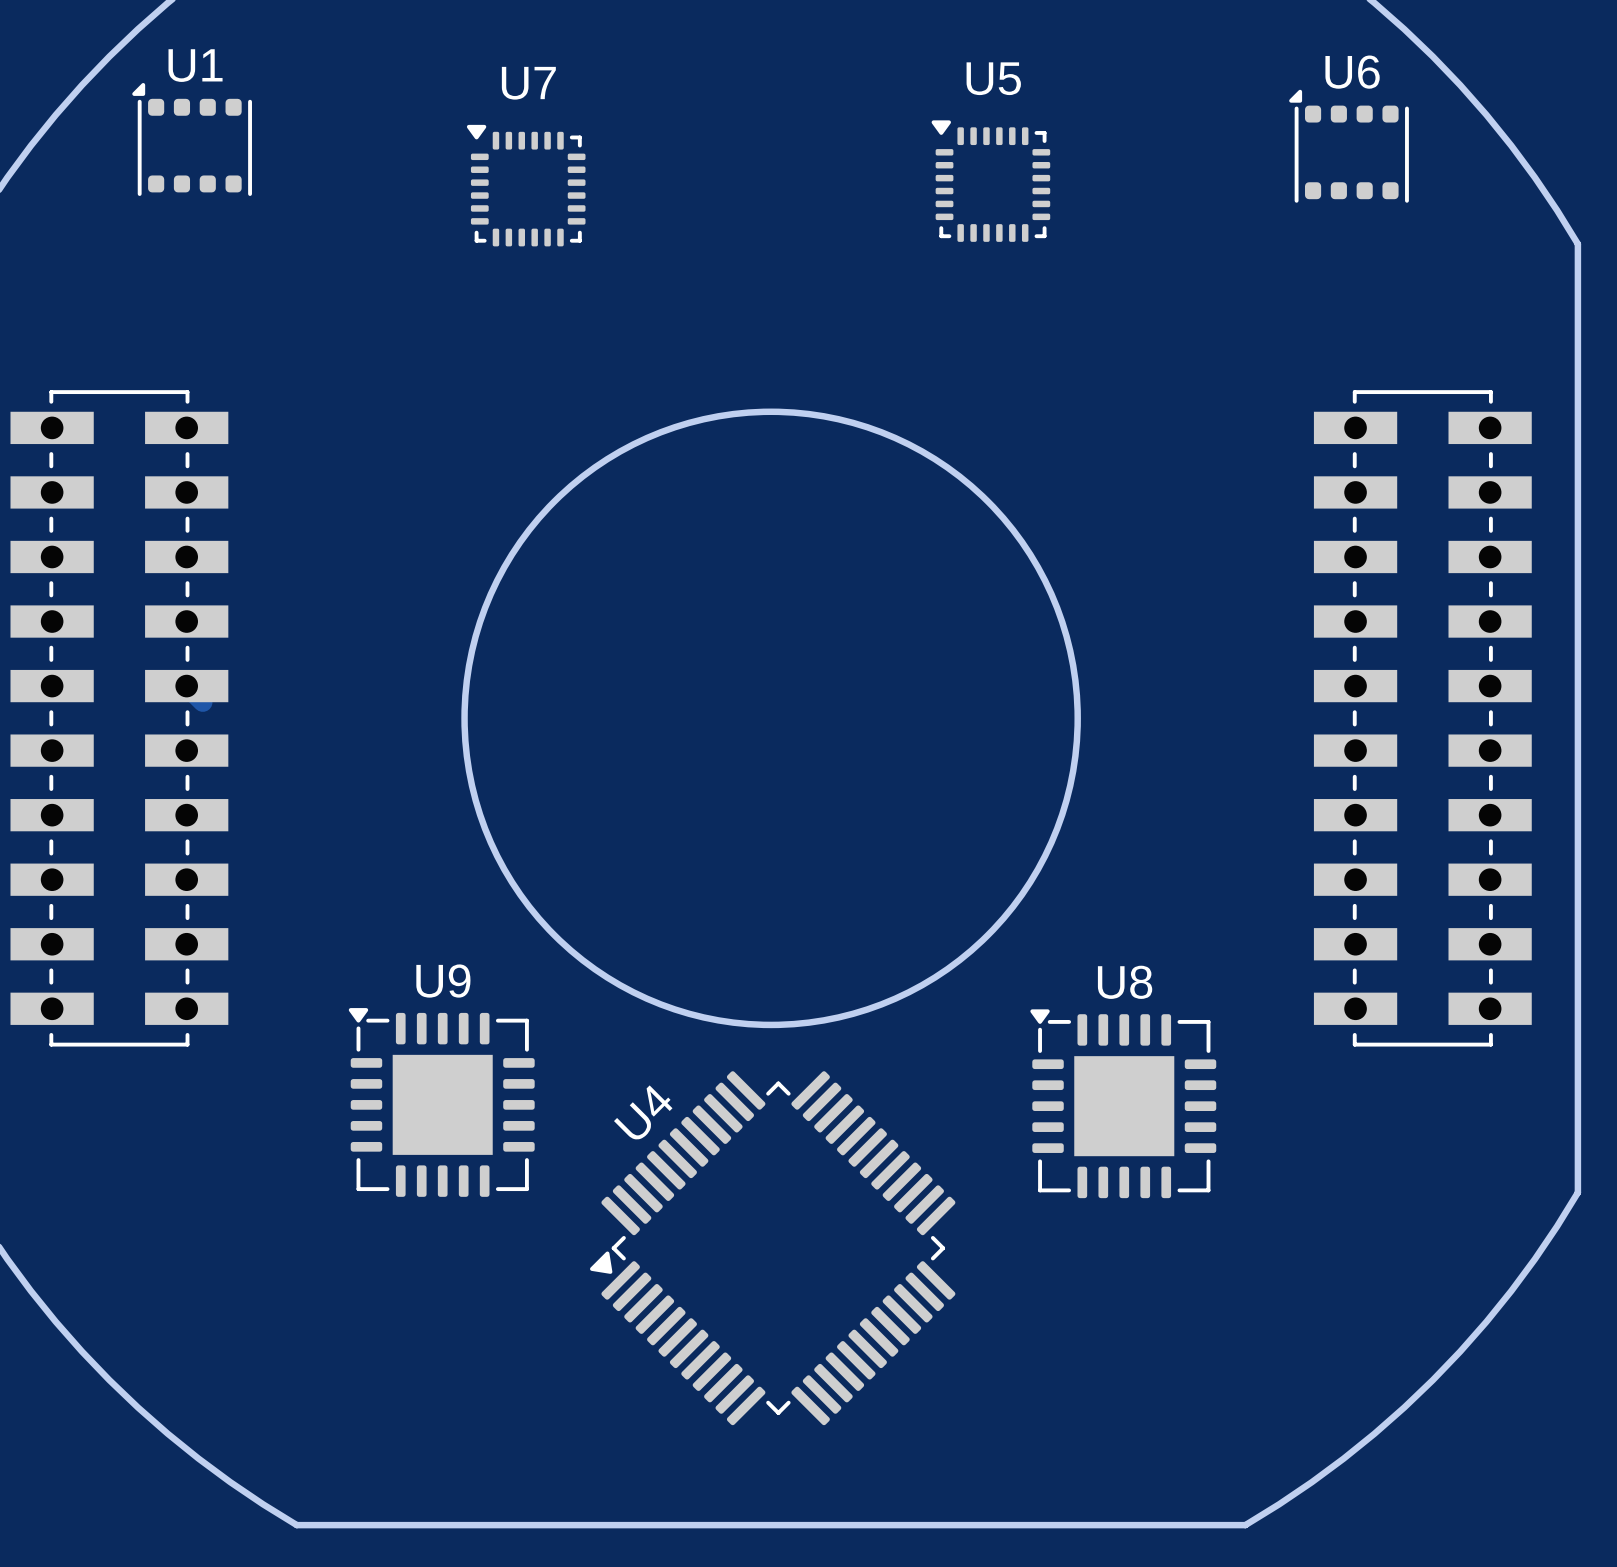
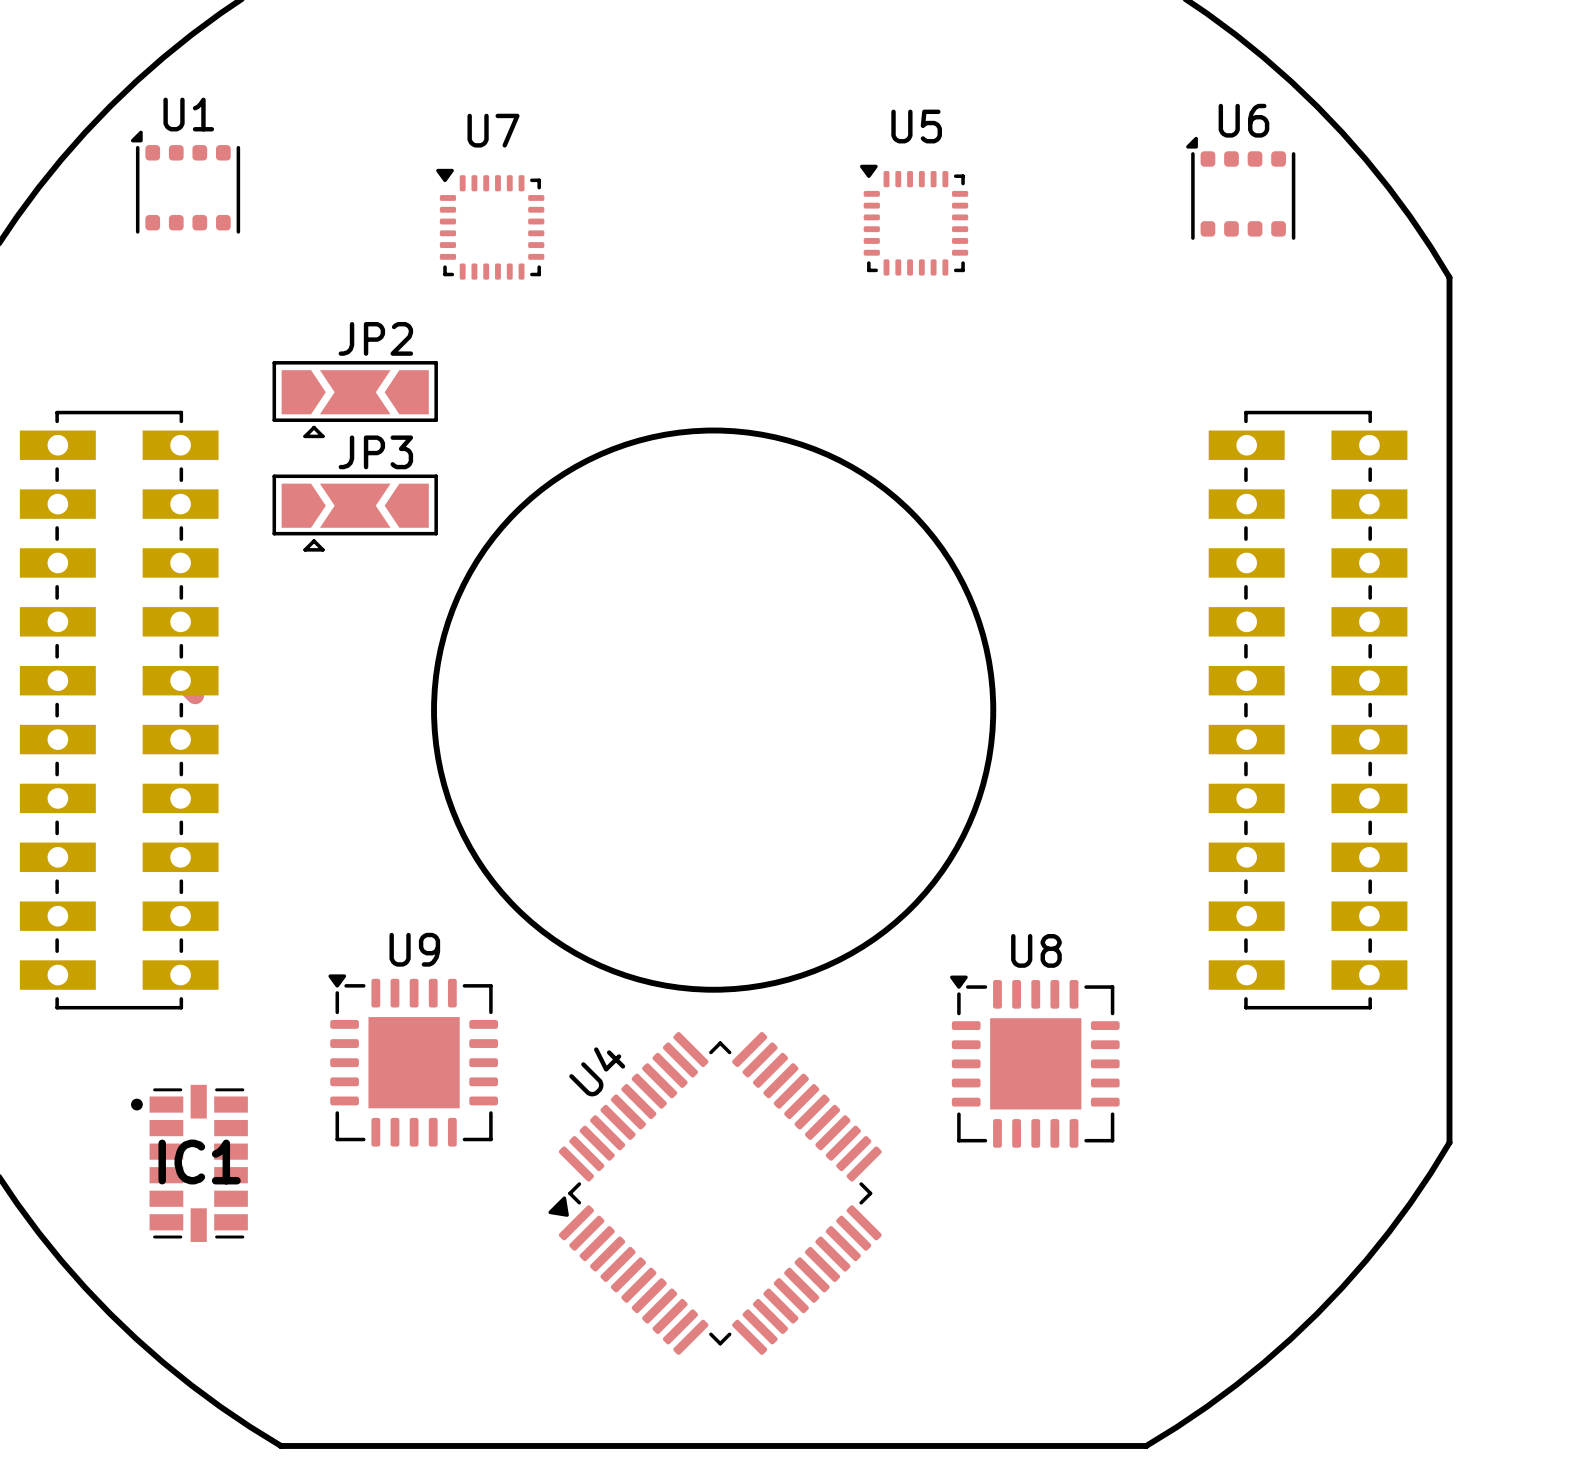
JP2: none -> (355, 399)
JP3: none -> (355, 513)
IC1: none -> (189, 1163)

